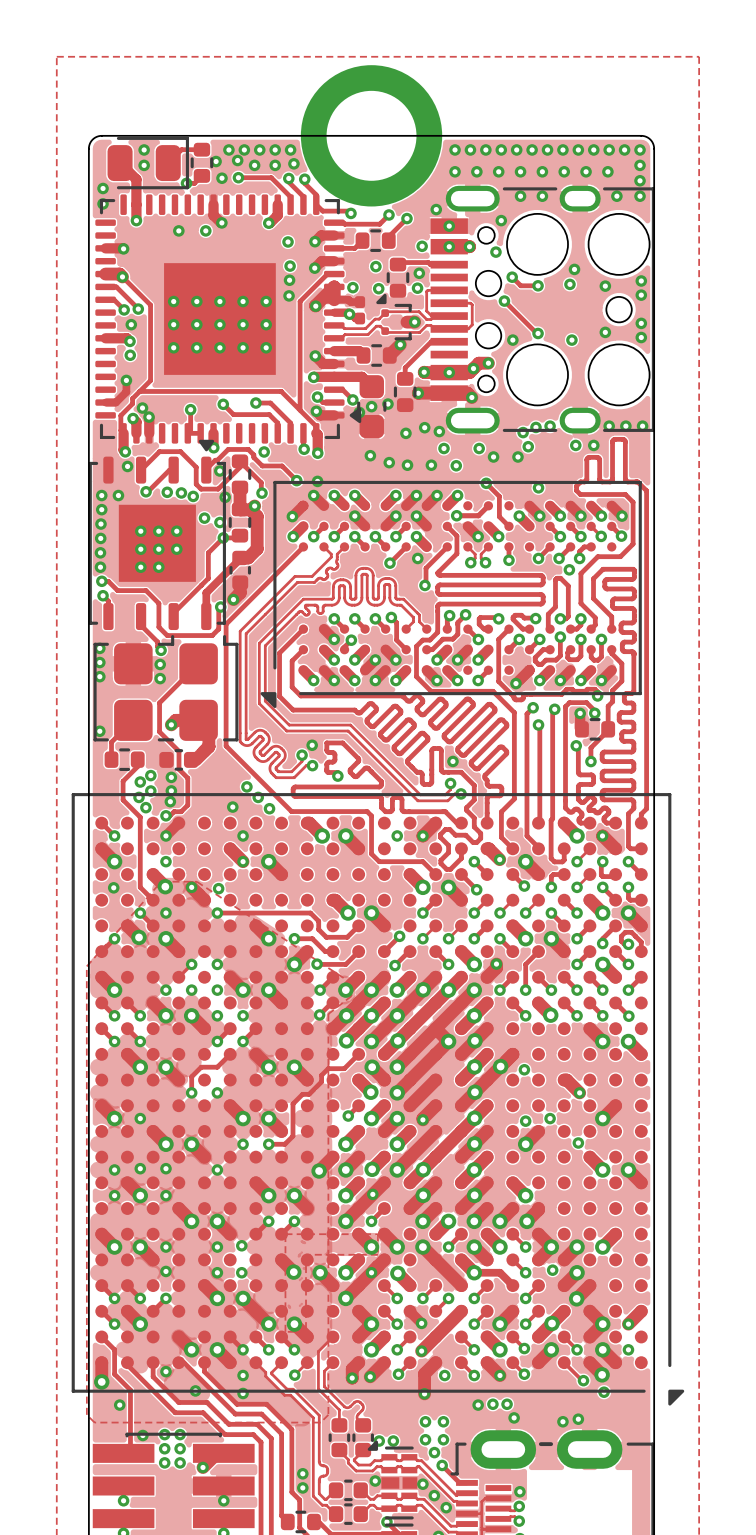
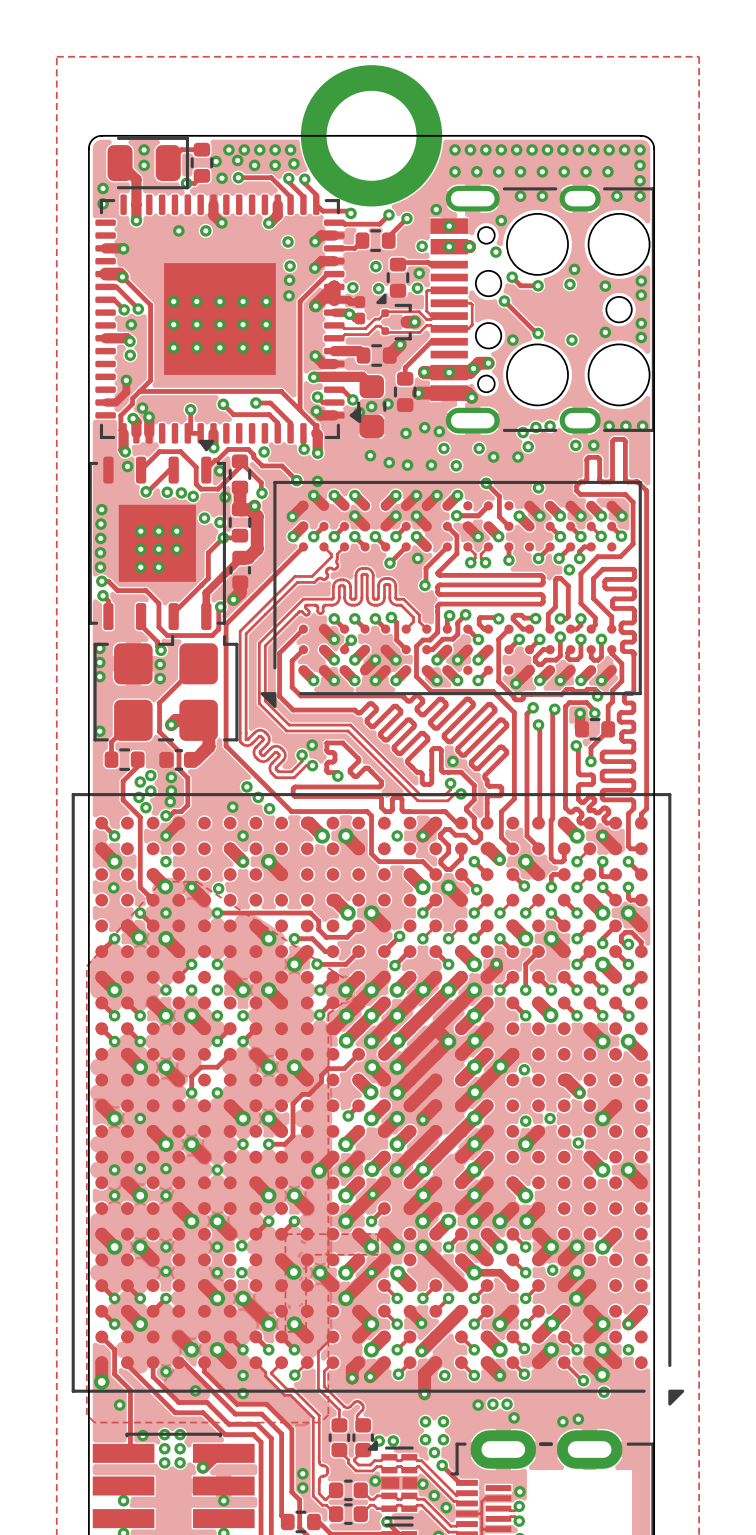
via: (101, 495) -> none
via: (118, 495) -> none

